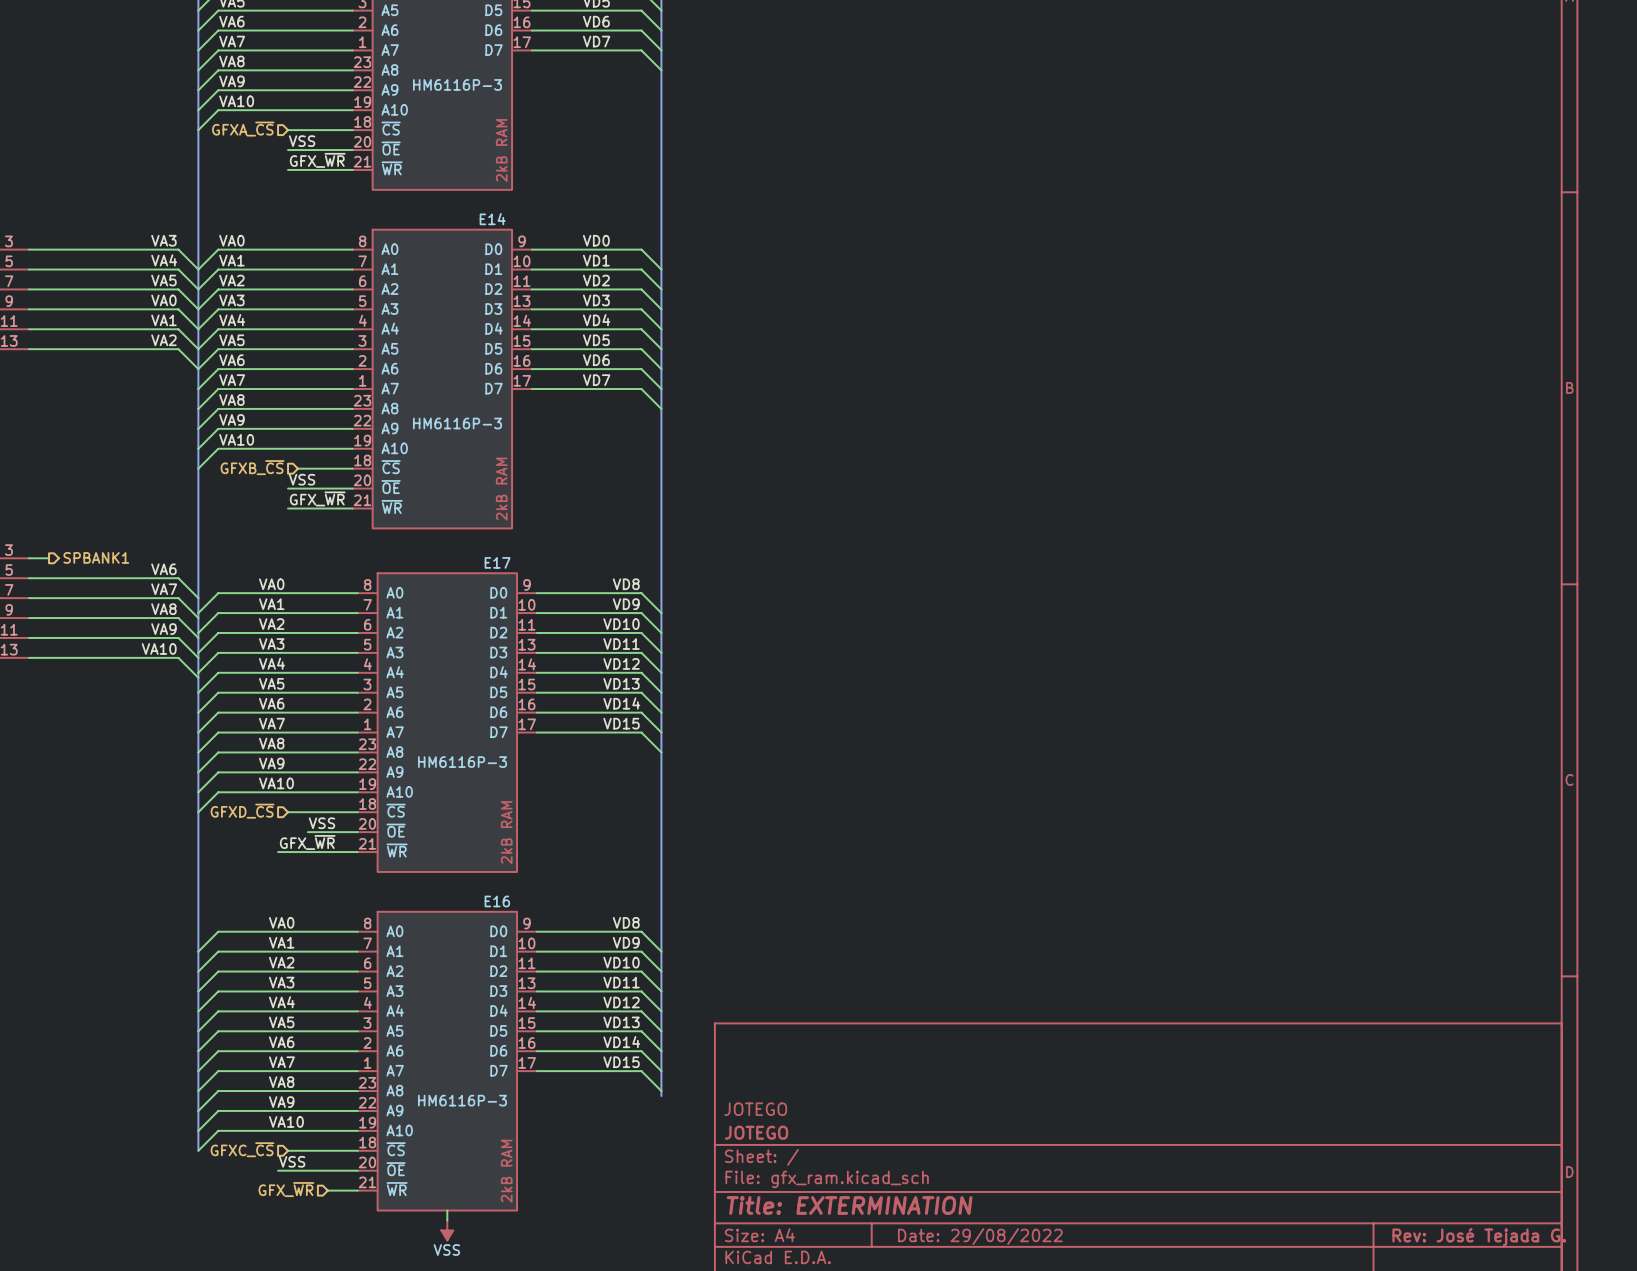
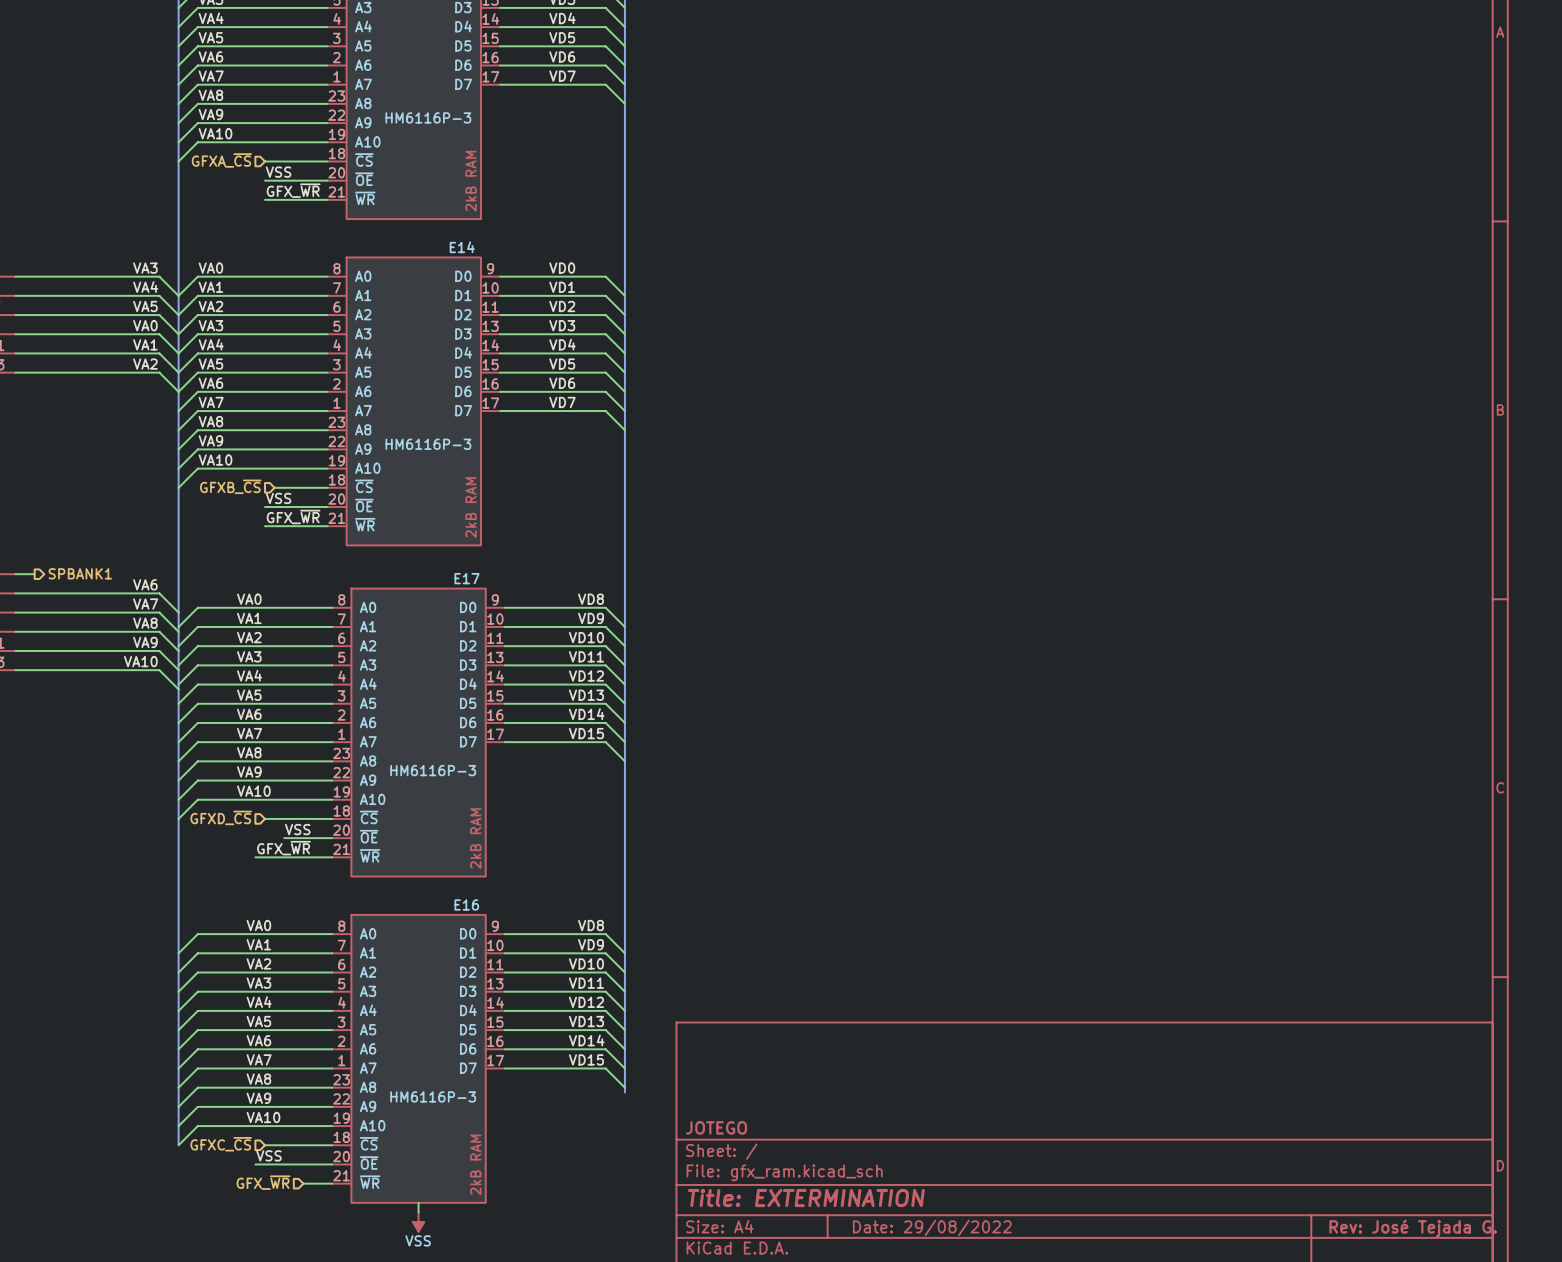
title block: JOTEGO (755, 1109) -> none

